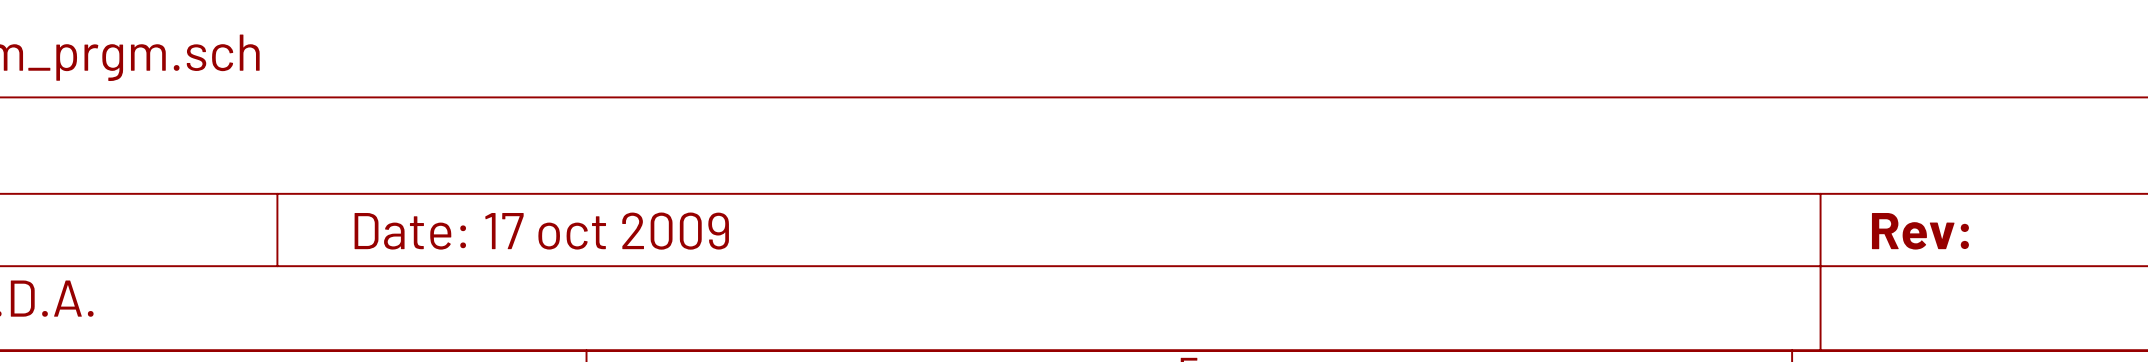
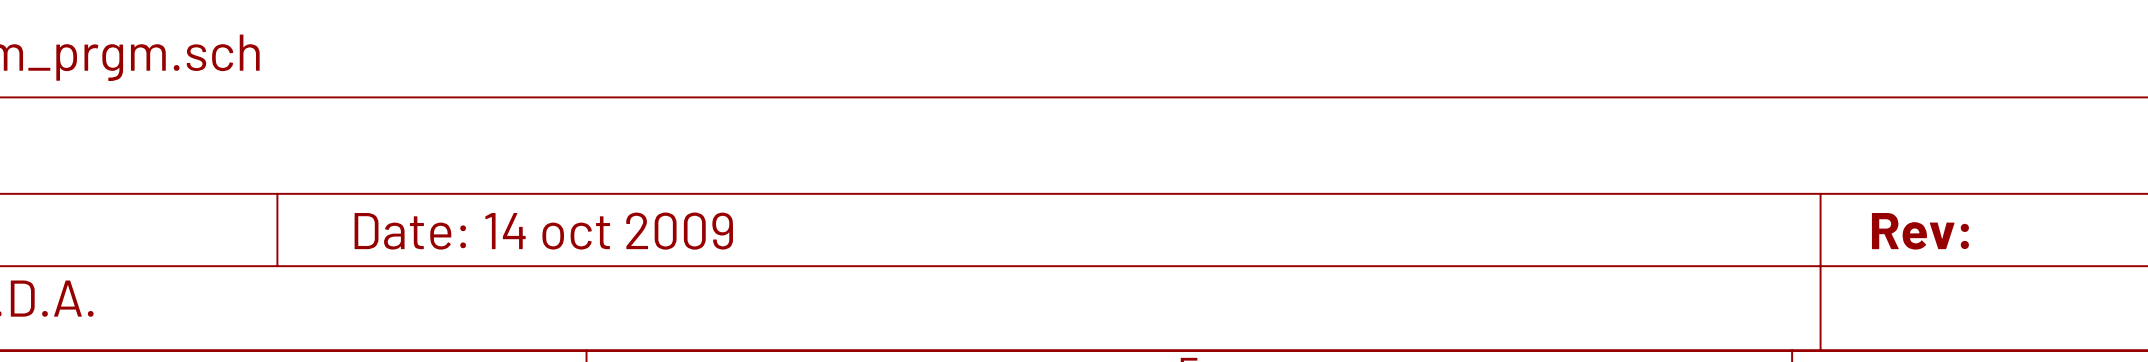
title block: Date: 17 oct 2009 (541, 231) -> Date: 14 oct 2009 (543, 231)

